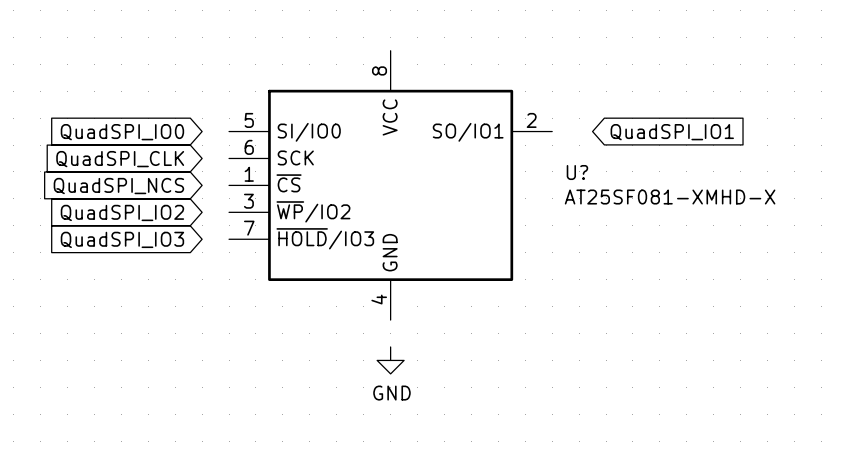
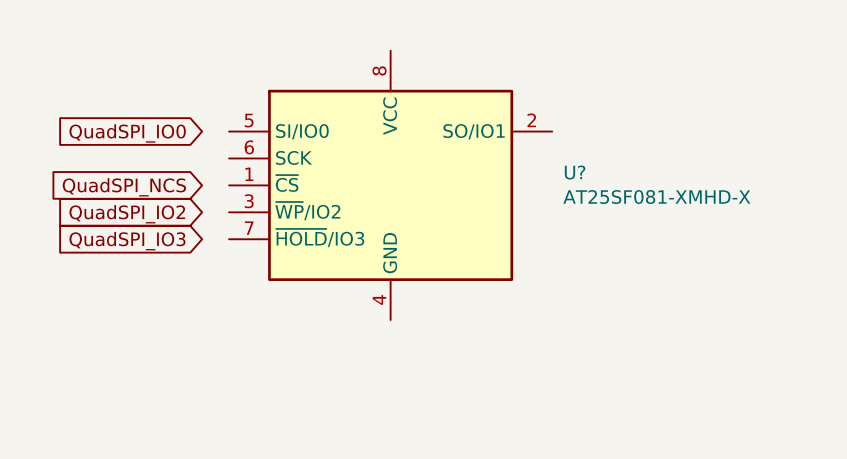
global label: QuadSPI_IO1 (672, 132) -> none
global label: QuadSPI_CLK (120, 159) -> none
power symbol: GND (390, 360) -> none

